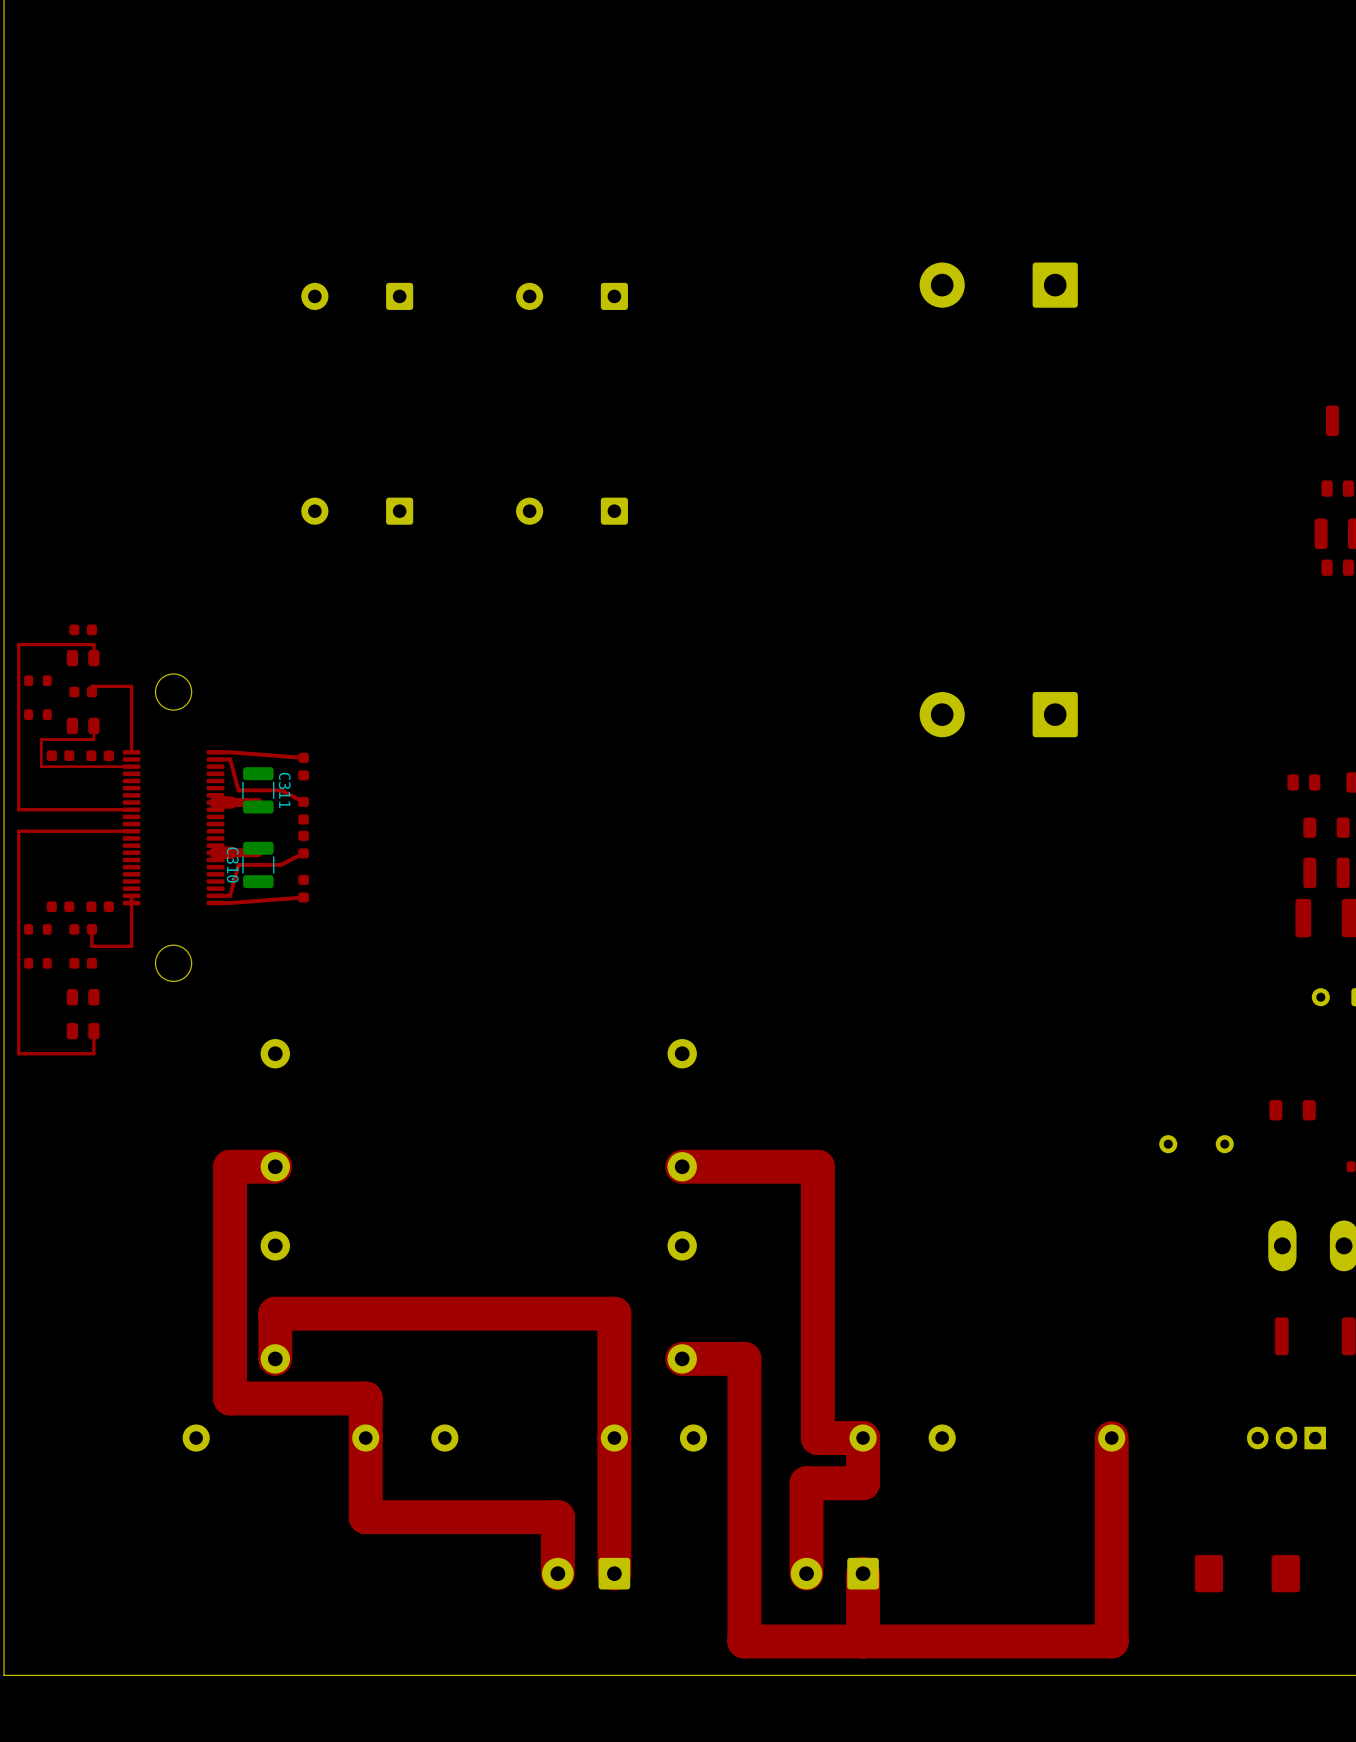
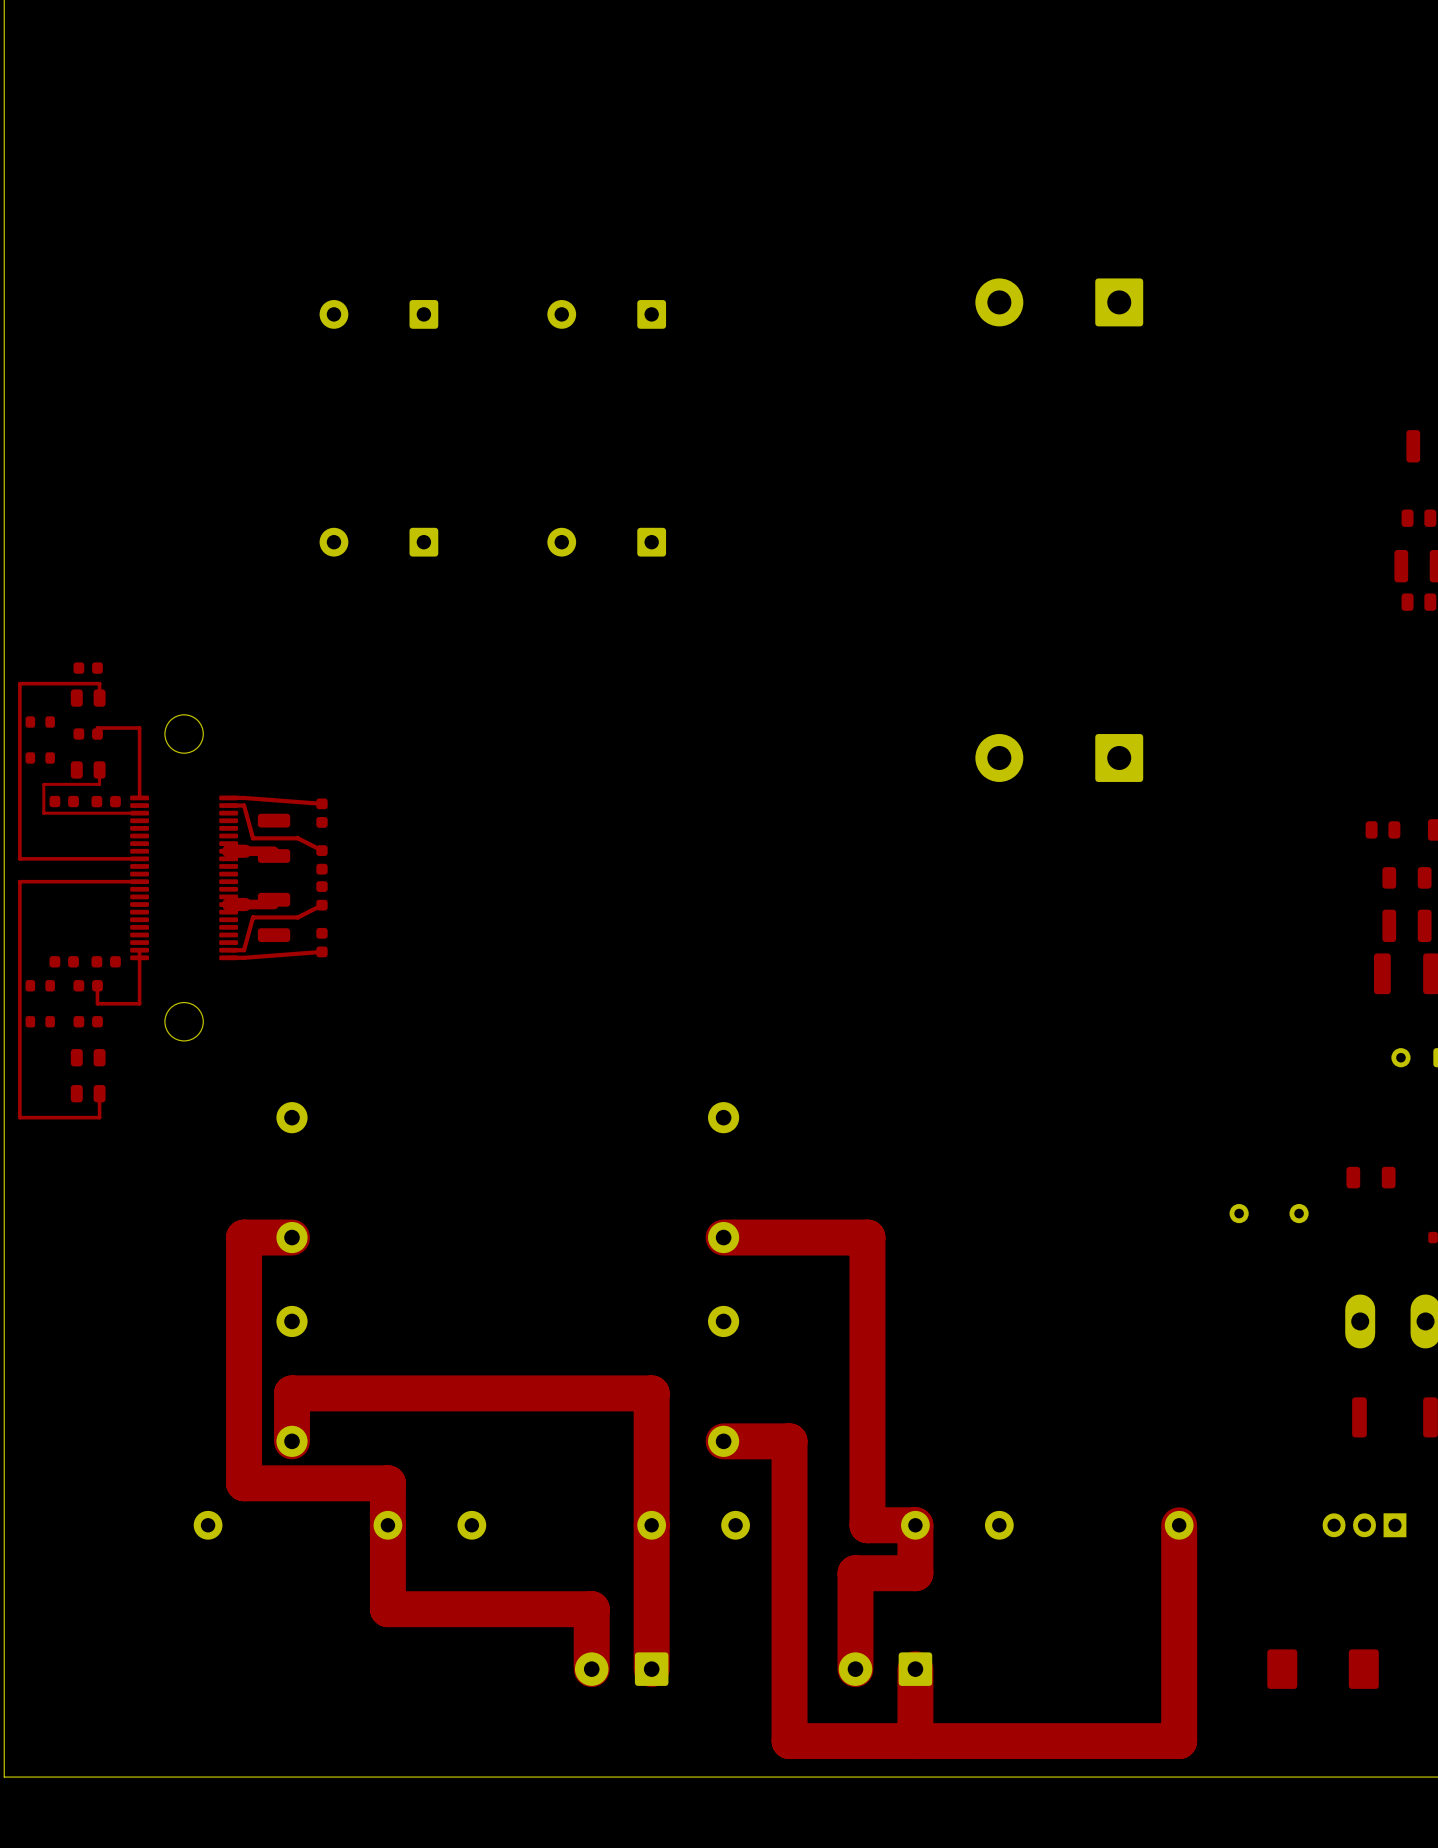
C311 side: bottom (258, 790) -> top (274, 838)
C310 side: bottom (258, 864) -> top (274, 917)

